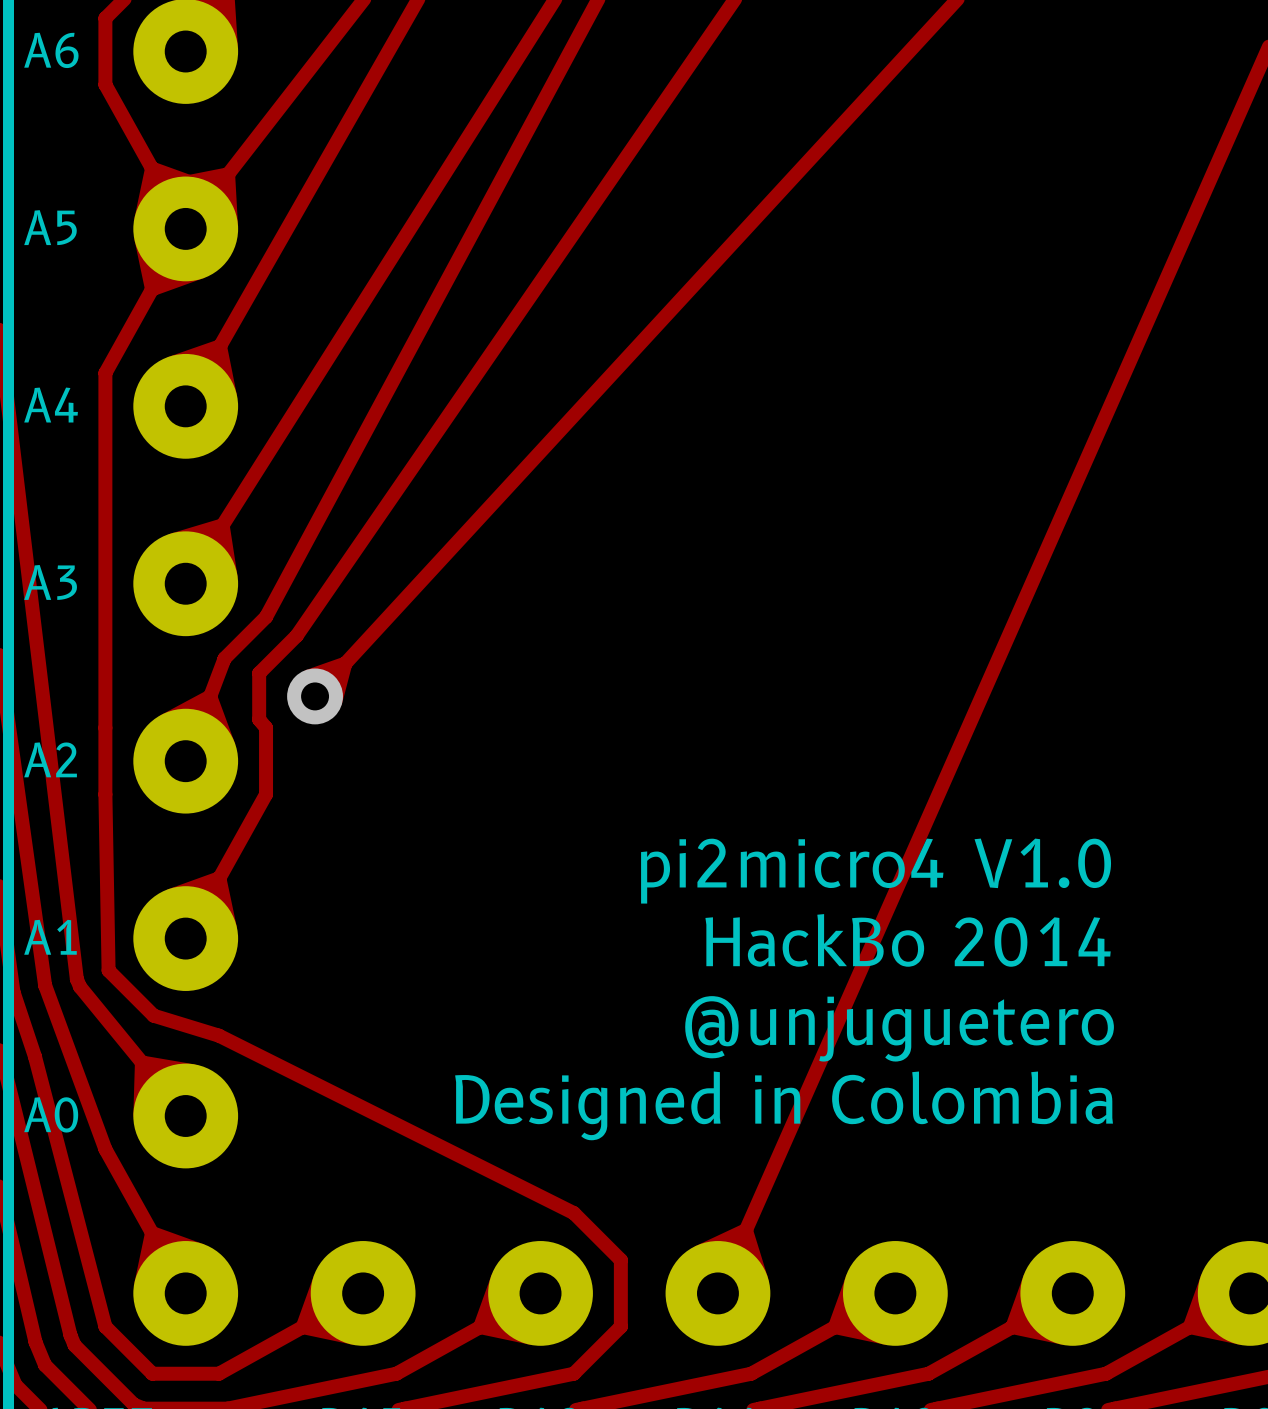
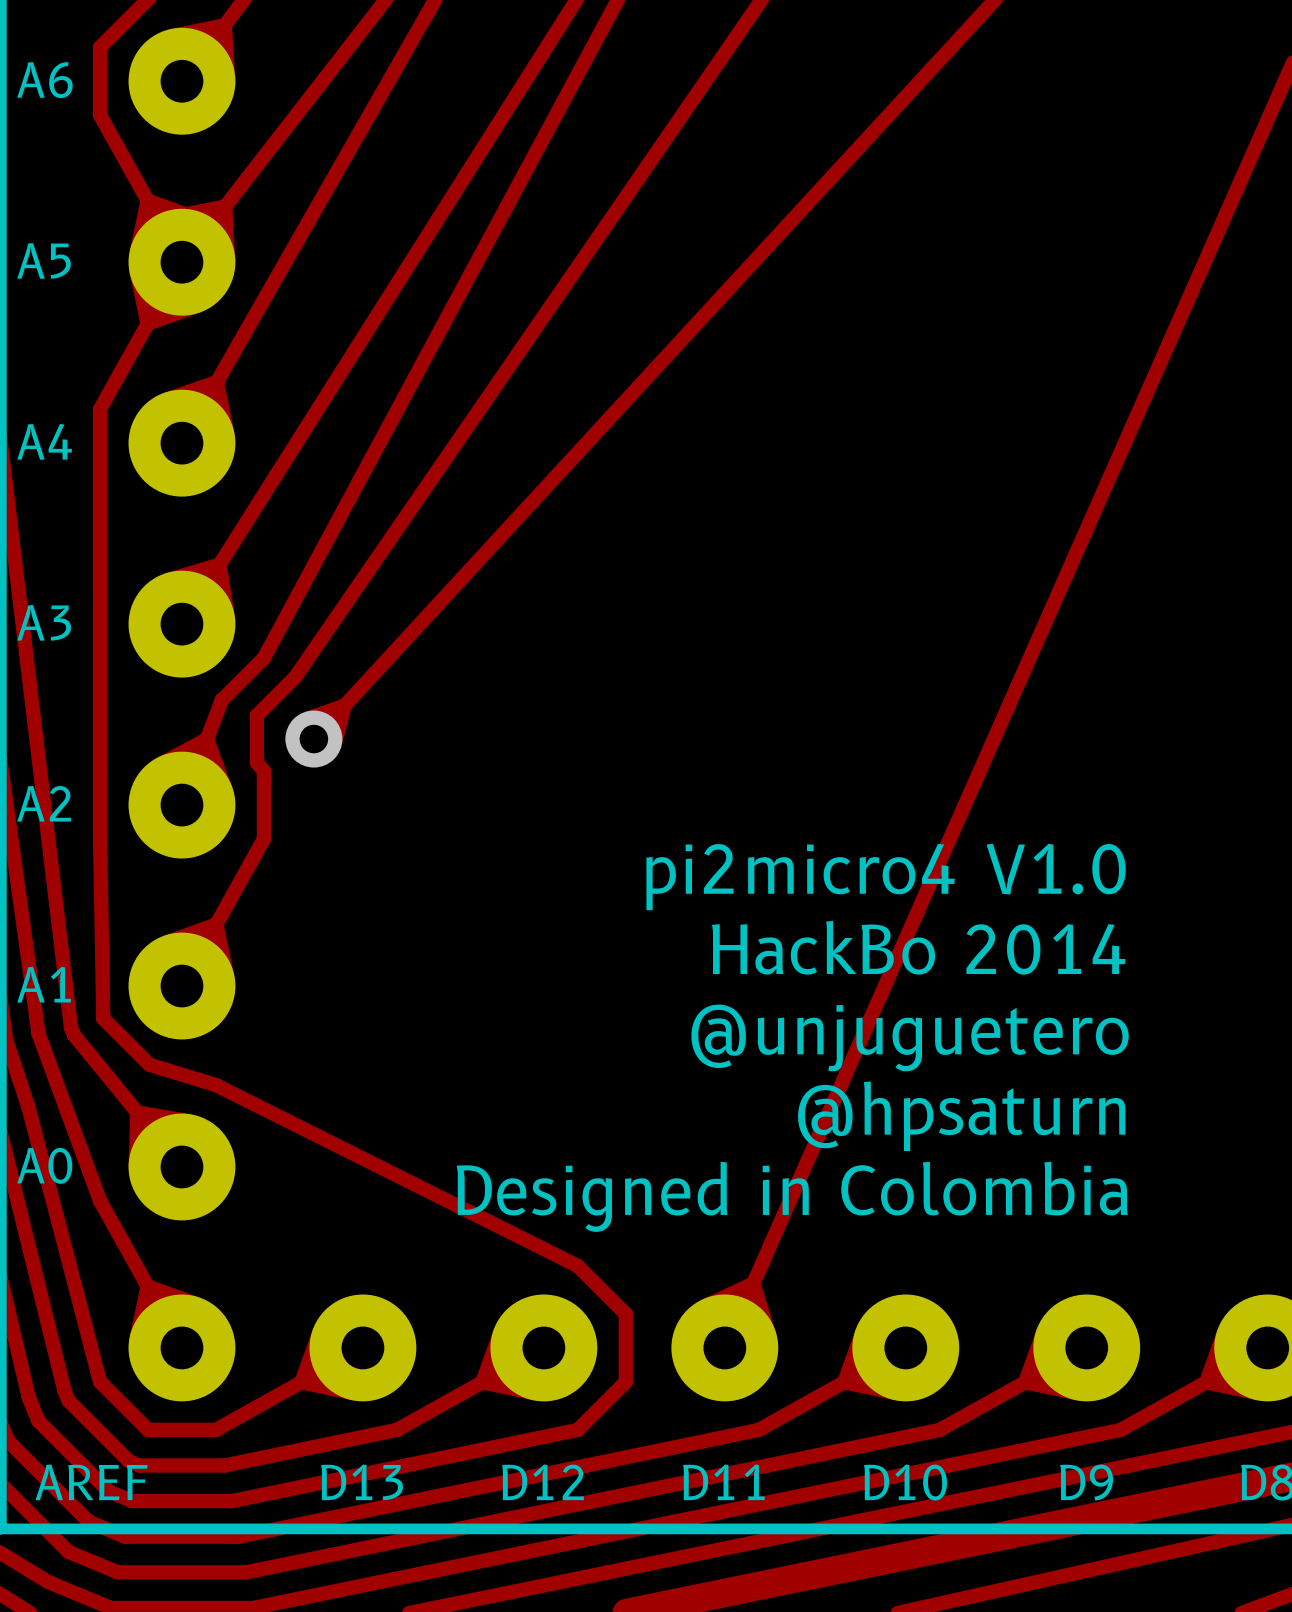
text position: pi2micro4 V1.0 (876, 871) -> pi2micro4 V1.0 (886, 877)
text position: HackBo 2014 (908, 940) -> HackBo 2014 (918, 947)
text position: @unjuguetero (899, 1028) -> @unjuguetero (910, 1037)
text: none -> @hpsaturn (961, 1116)
text position: Designed in Colombia (784, 1105) -> Designed in Colombia (792, 1196)

